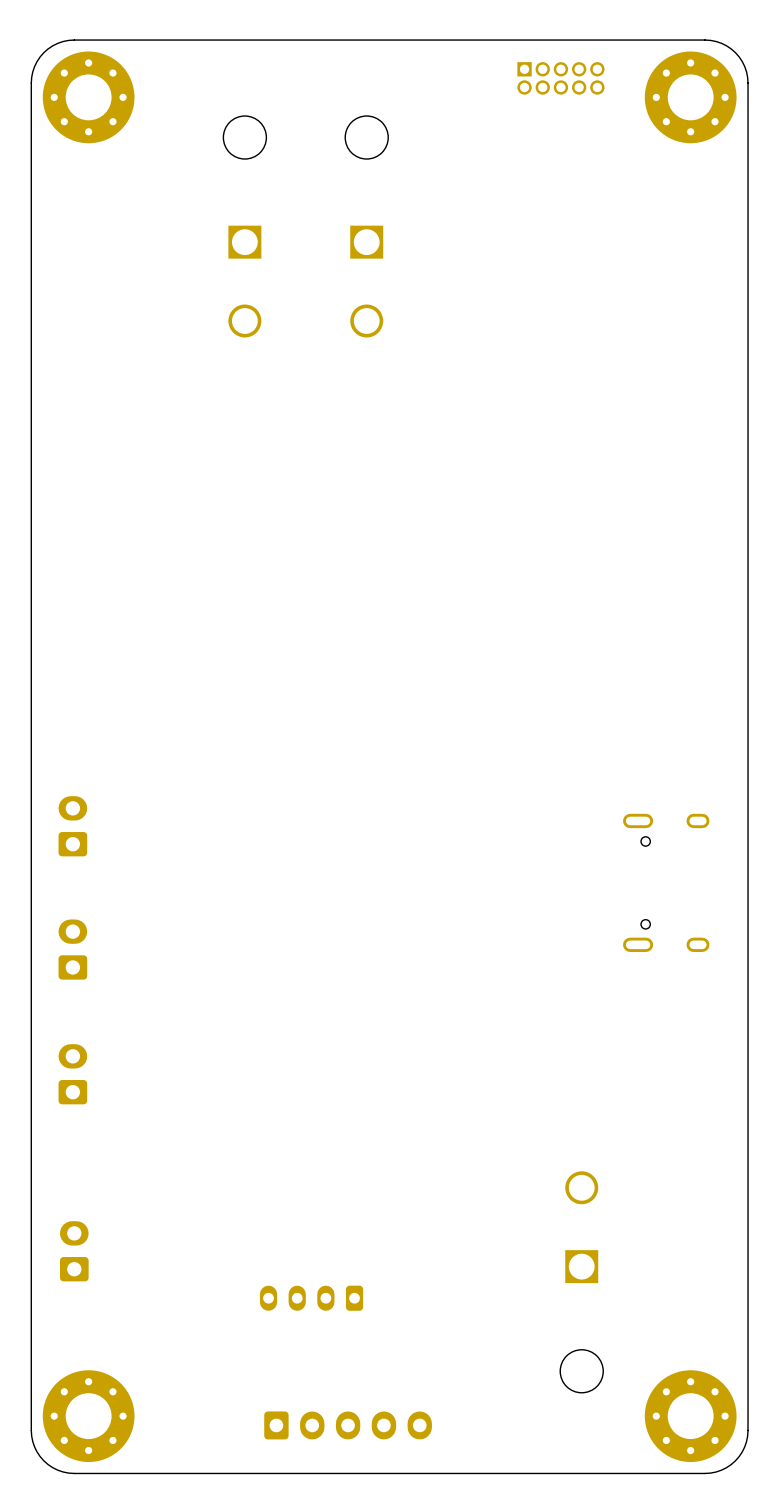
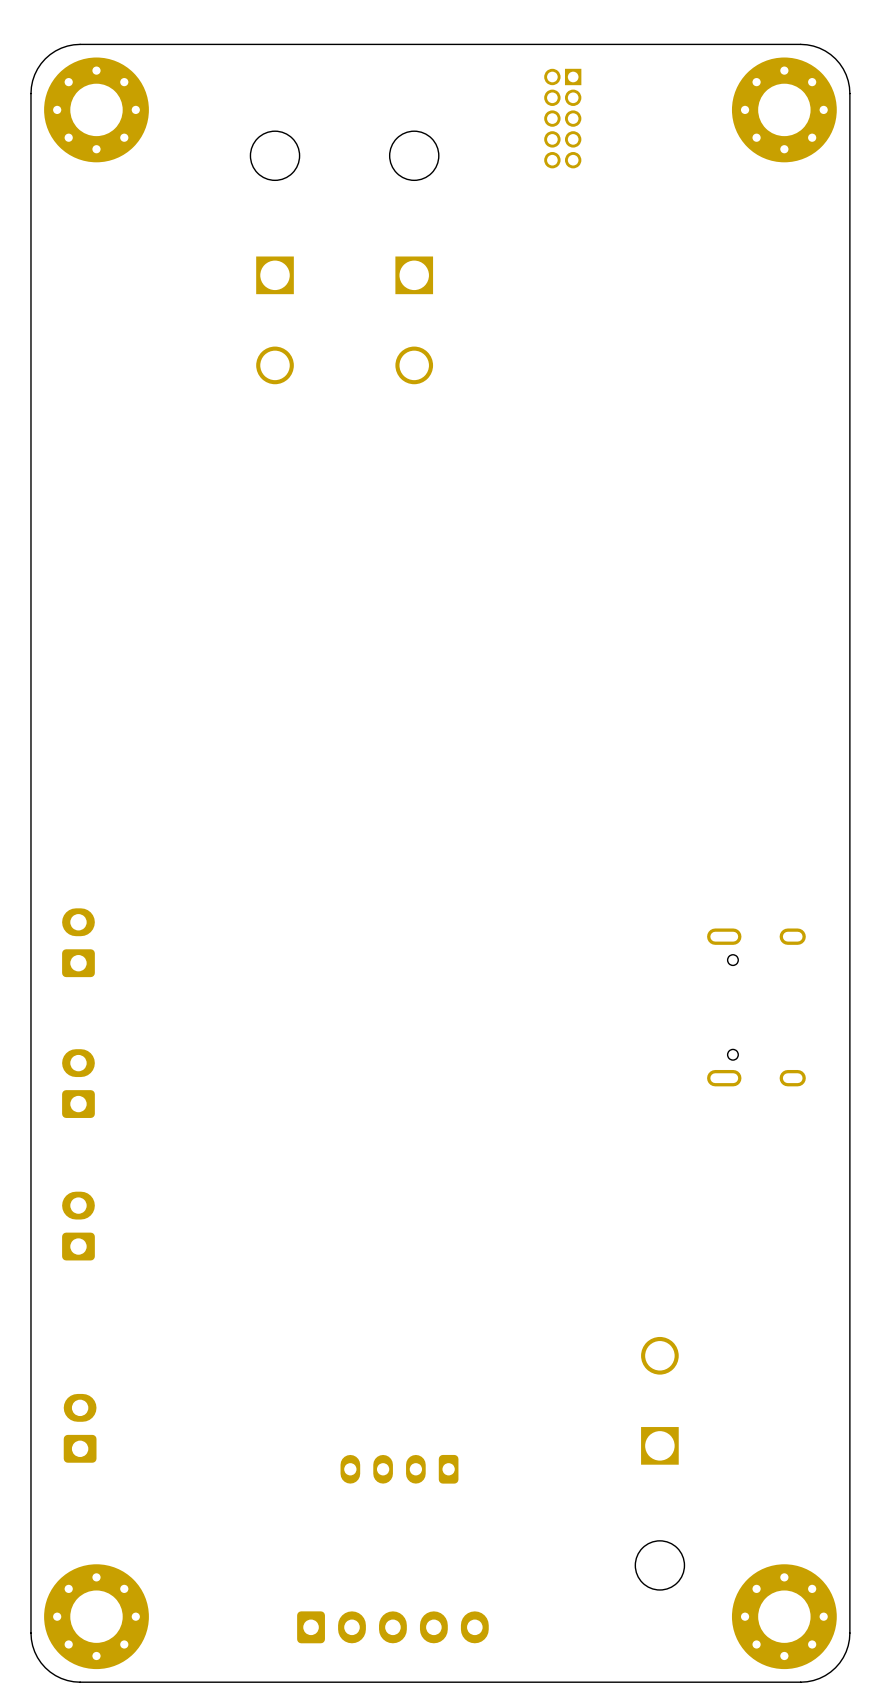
part rotation: 0° (560, 78) -> 90° clockwise (562, 118)
part position: (560, 78) -> (562, 118)
part position: (311, 1298) -> (399, 1469)

